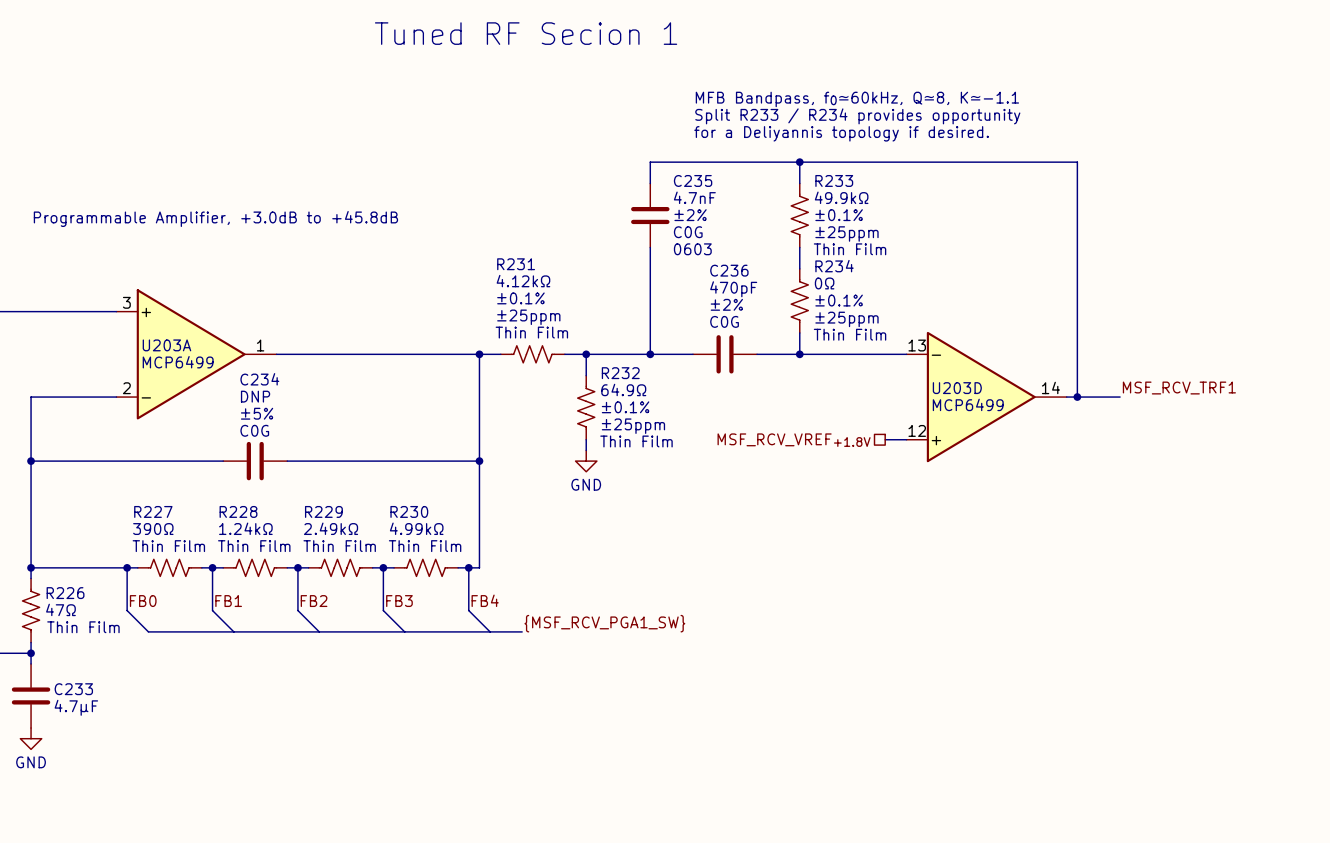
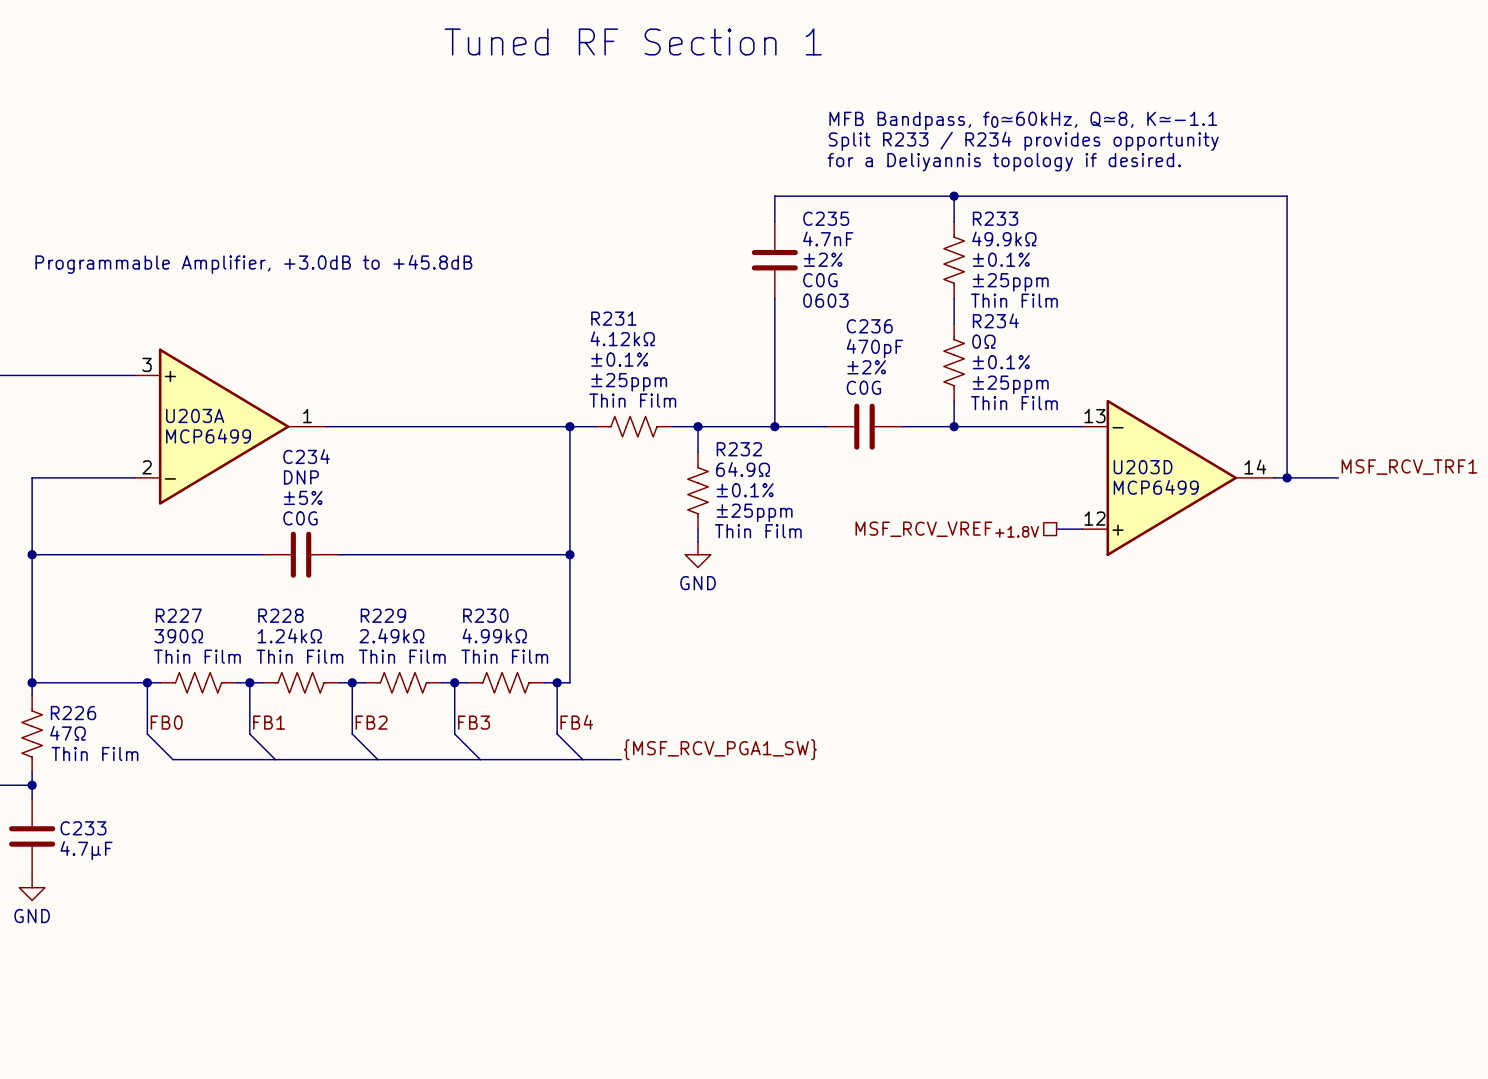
text: Tuned RF Secion 1 (526, 33) -> Tuned RF Section 1 (633, 41)

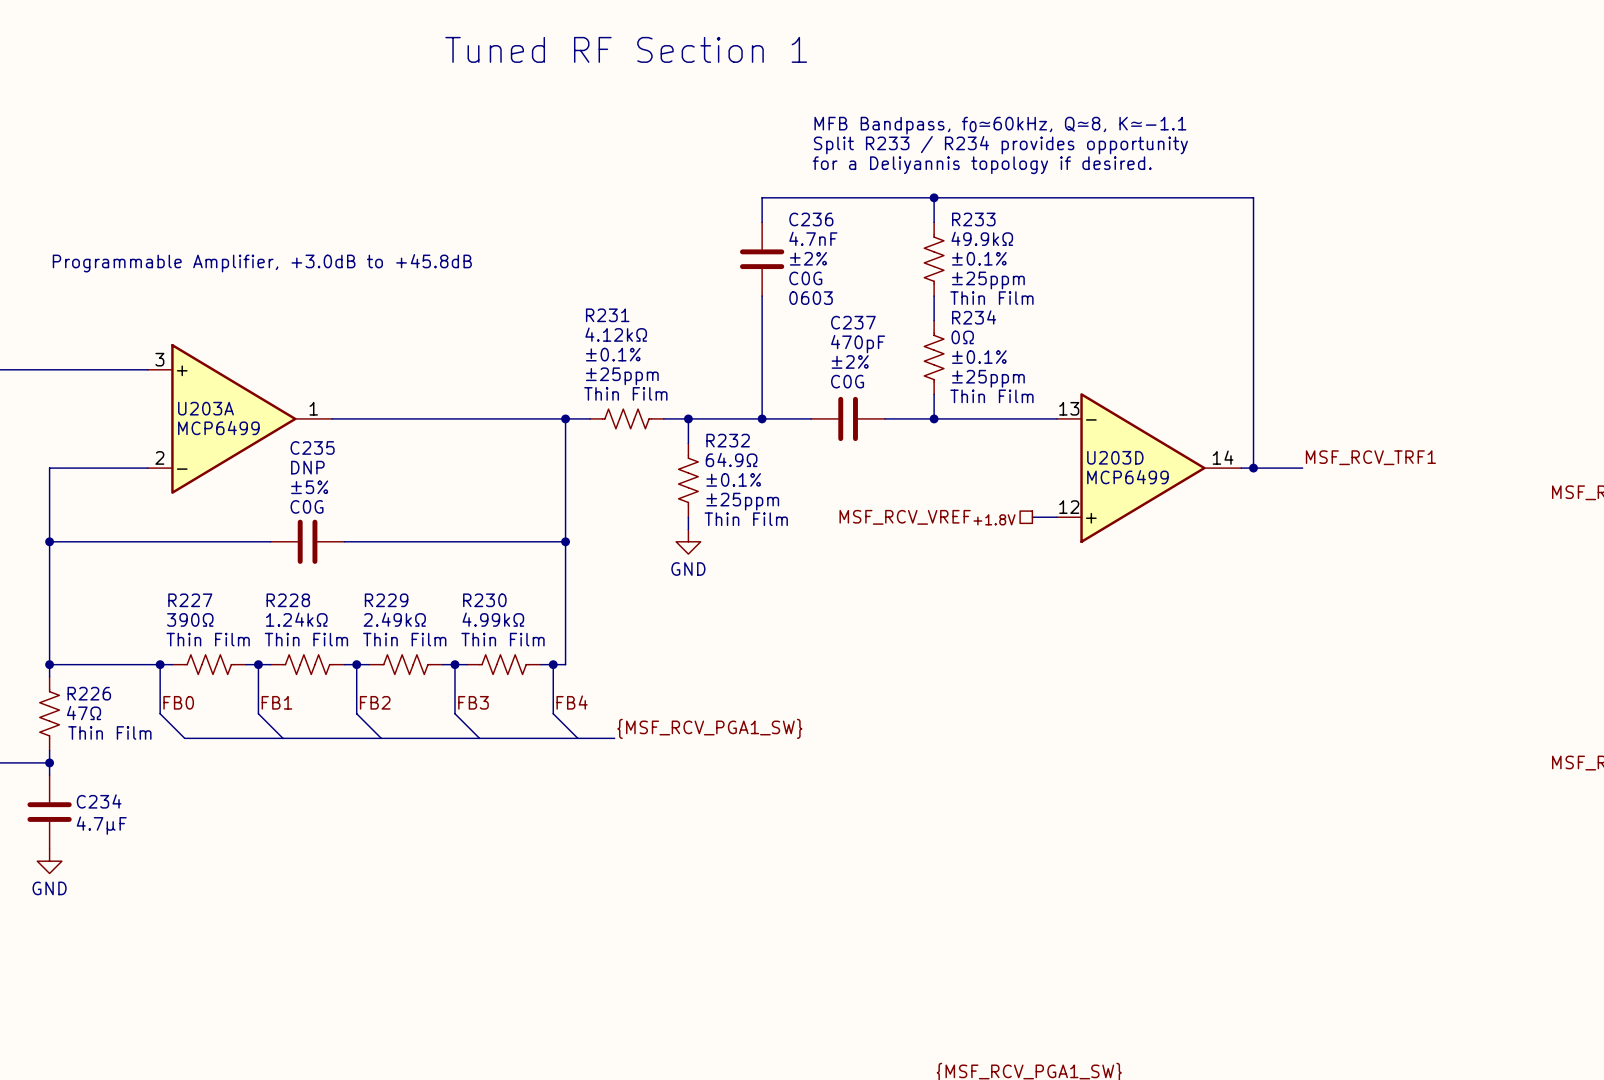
C235 name: C235 (826, 218) -> C236 (811, 219)
C236 name: C236 (869, 326) -> C237 (853, 322)
C234 name: C234 (306, 456) -> C235 (312, 447)
C233 name: C233 (83, 828) -> C234 (99, 801)

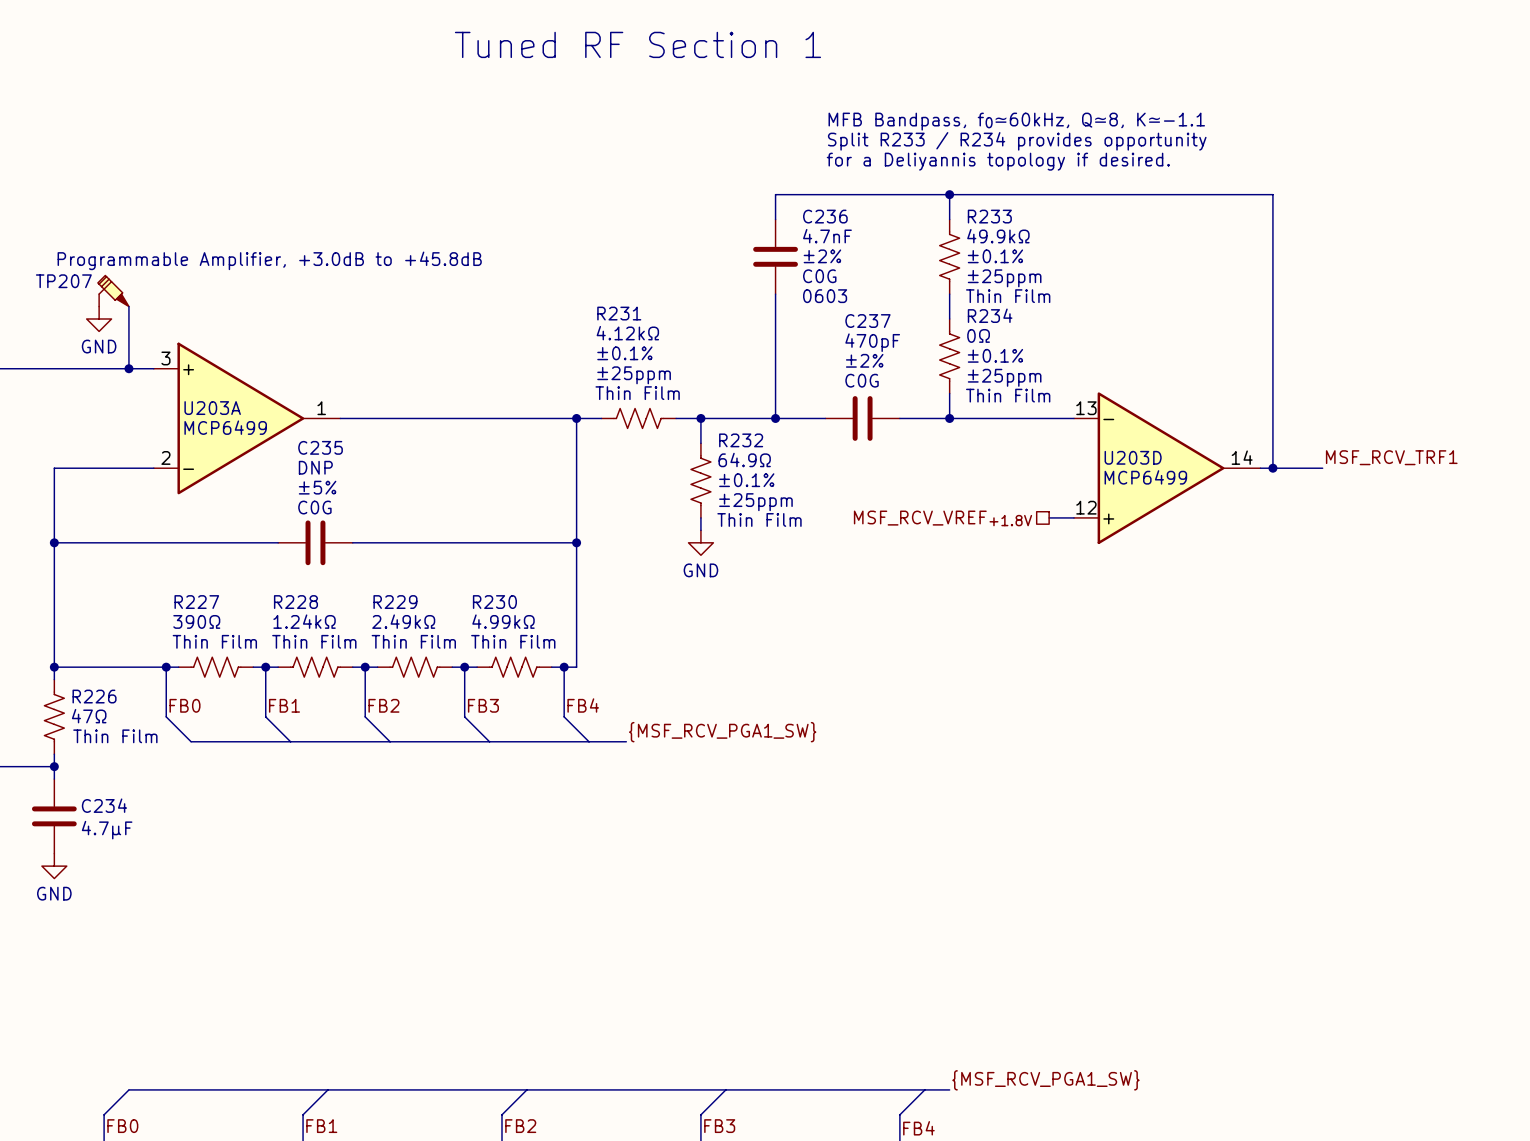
TP207: none -> (113, 291)
wire: none -> (128, 306) (128, 368)
power symbol: none -> GND (99, 318)
junction: none -> (128, 368)

